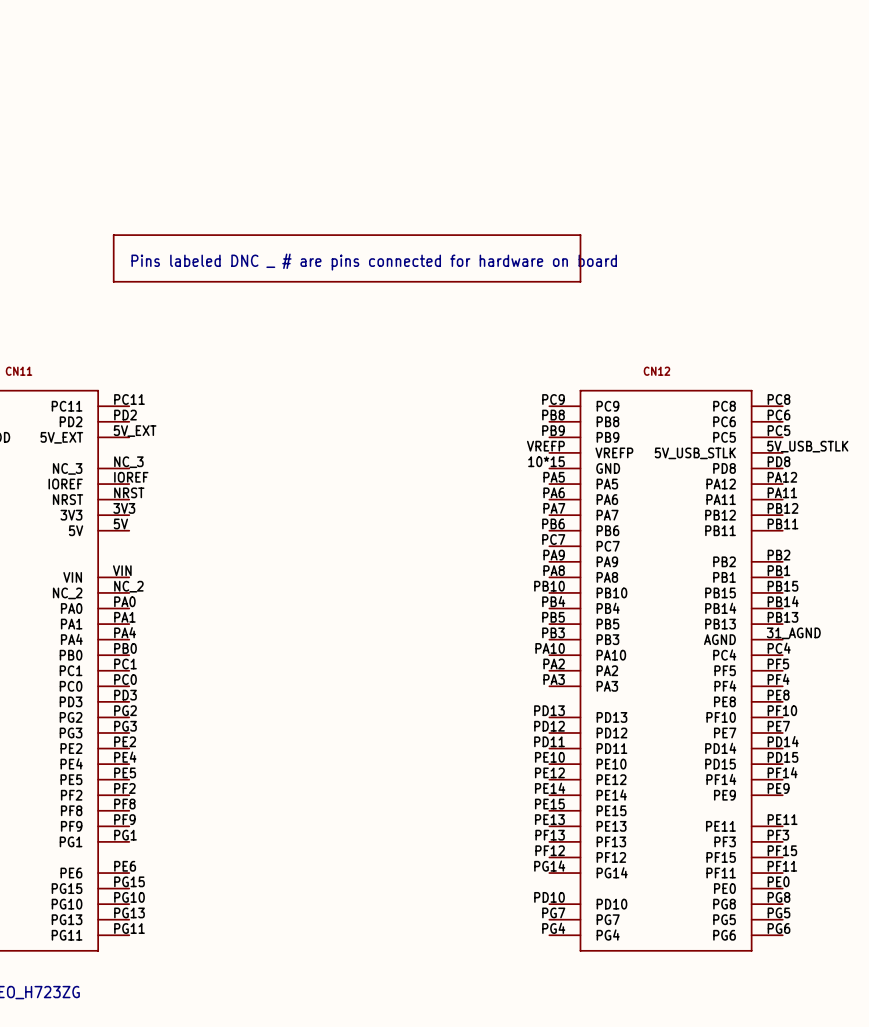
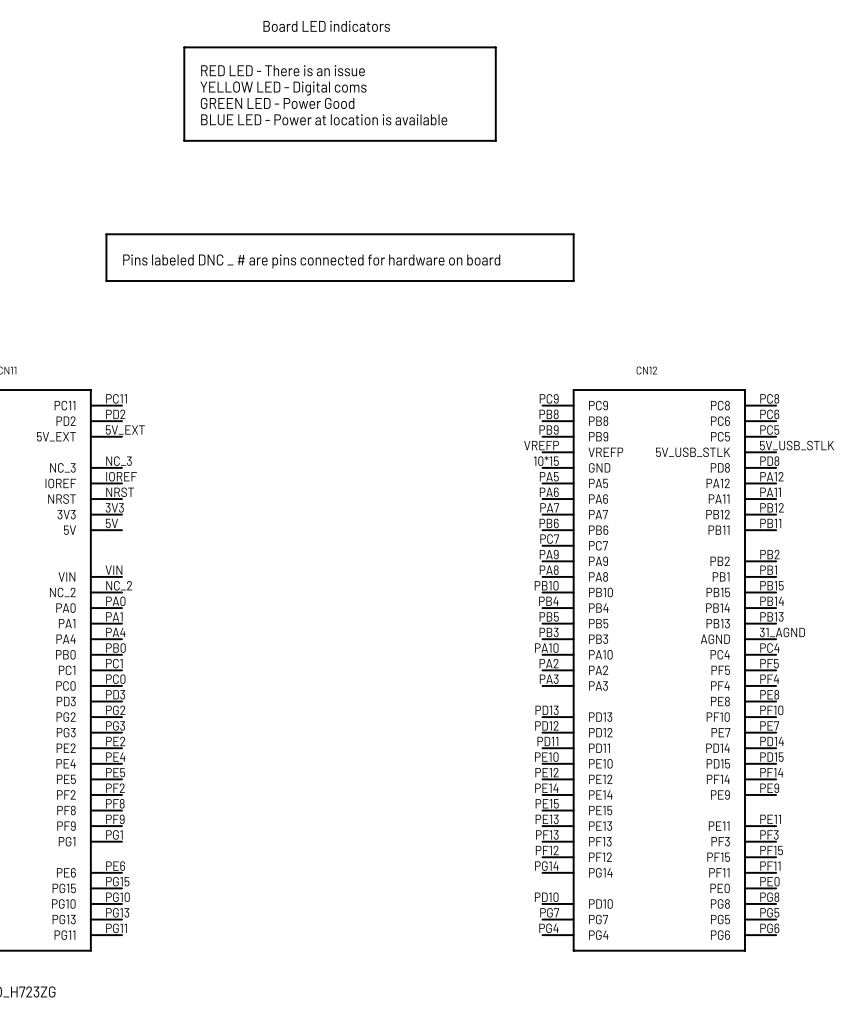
text: none -> Board LED indicators (326, 26)
line: none -> (184, 47) (184, 140) (495, 140) (495, 47) (184, 47)
text: none -> RED LED - There is an issue (283, 70)
text: none -> YELLOW LED - Digital coms (283, 88)
text: none -> GREEN LED - Power Good (277, 103)
text: none -> BLUE LED - Power at location is available (324, 119)

